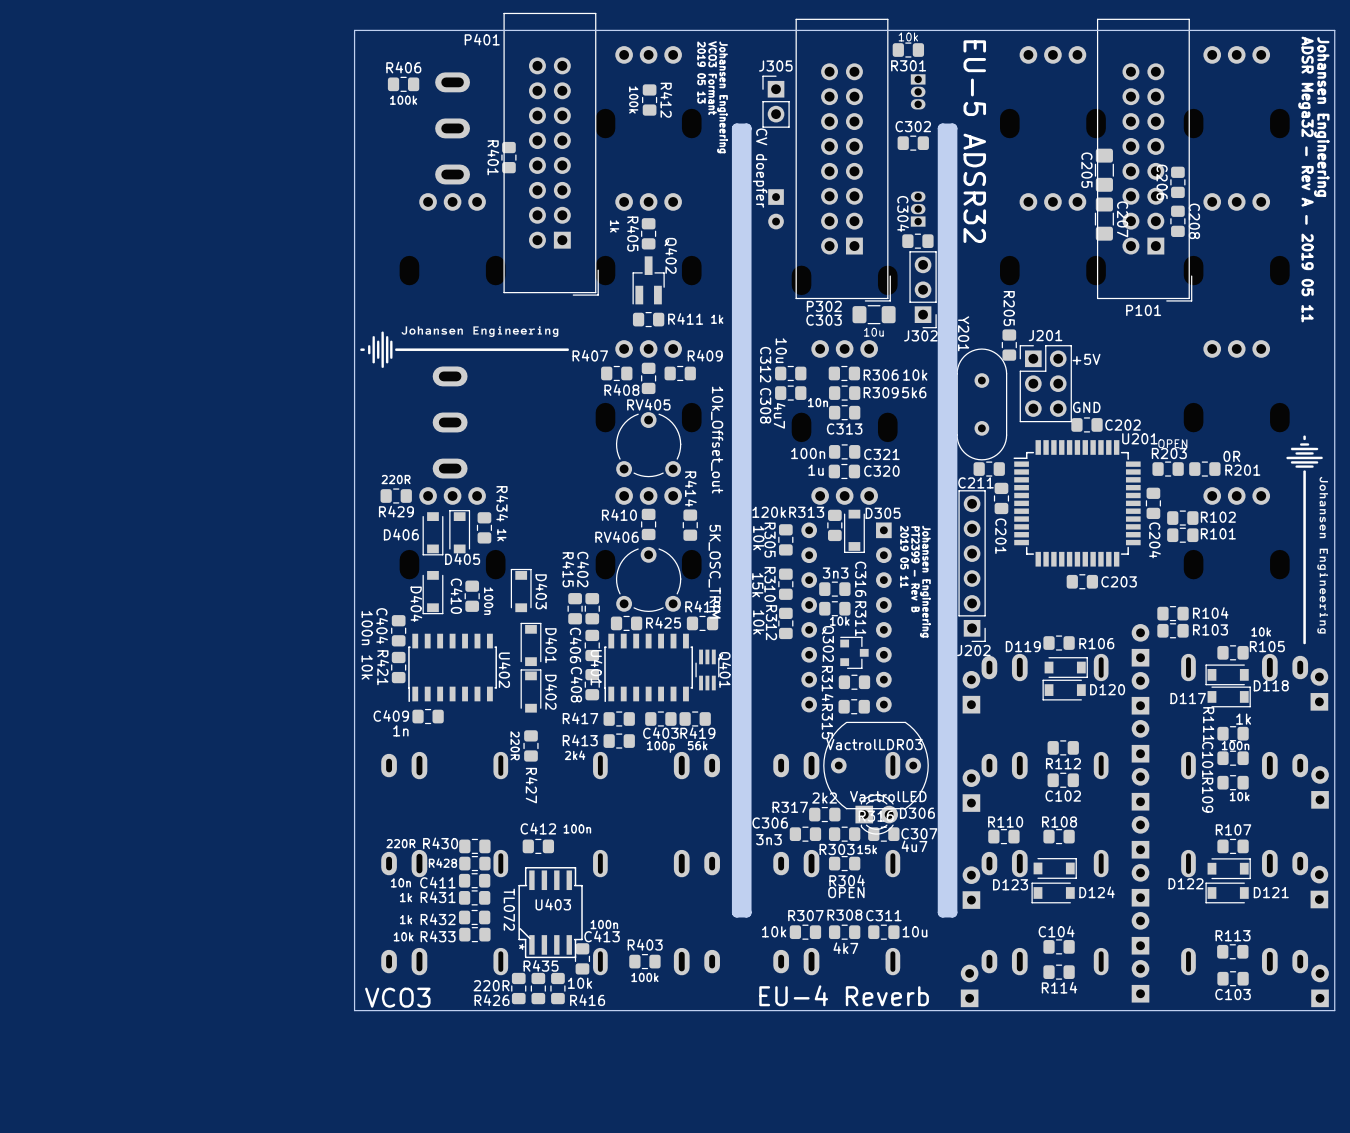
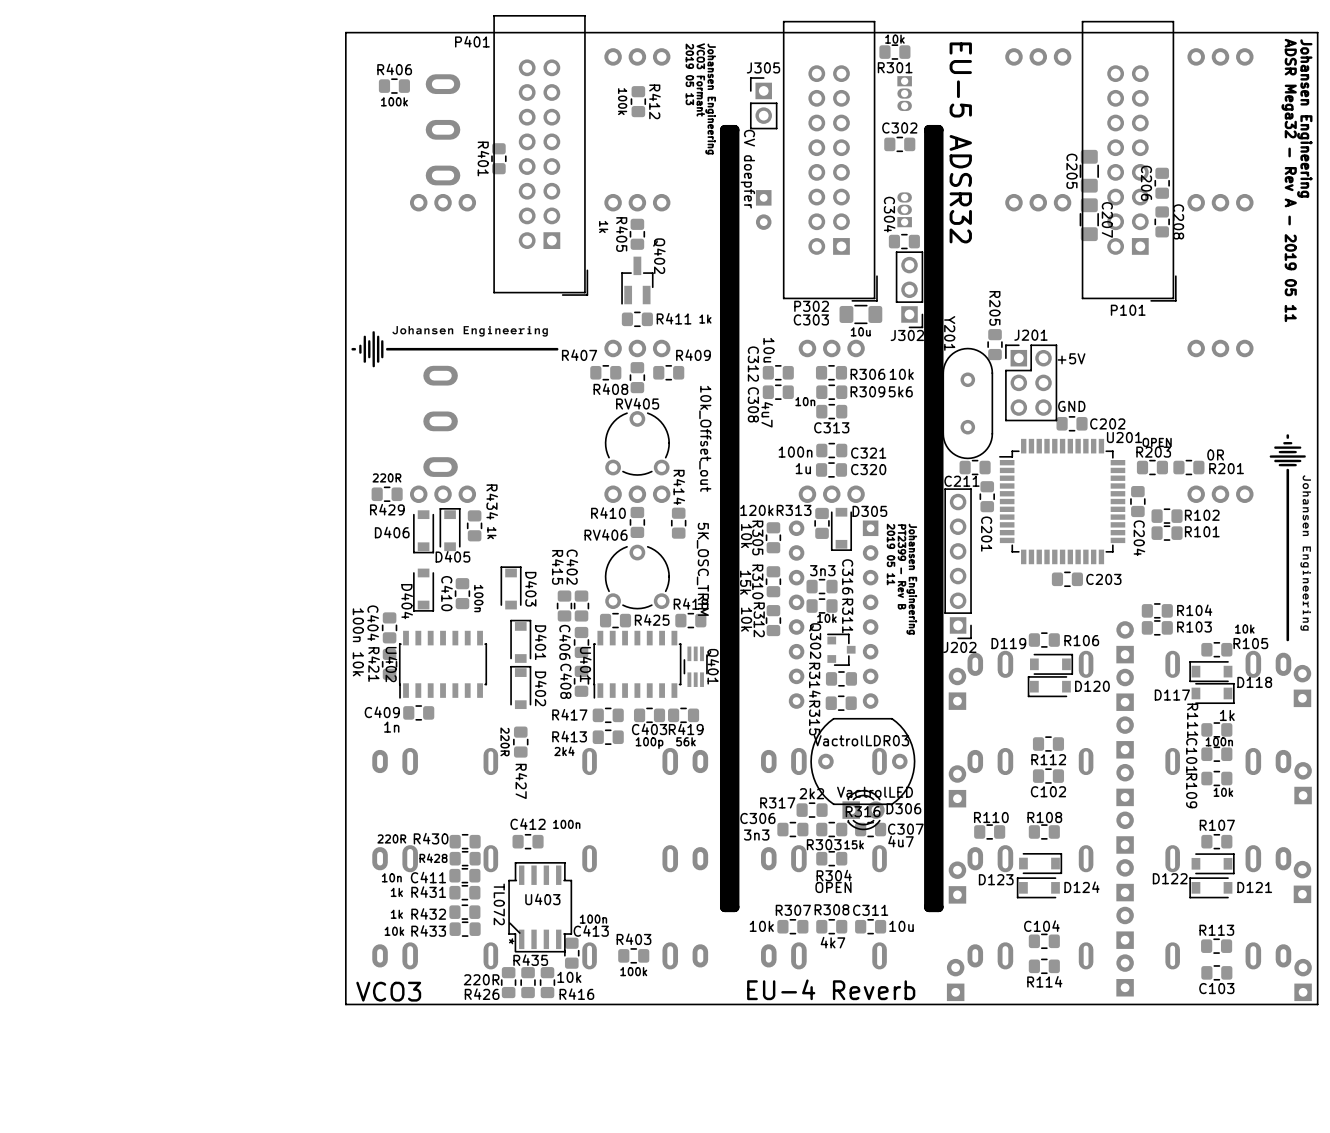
U402 name position: U402 (504, 670) -> U402 (391, 664)

